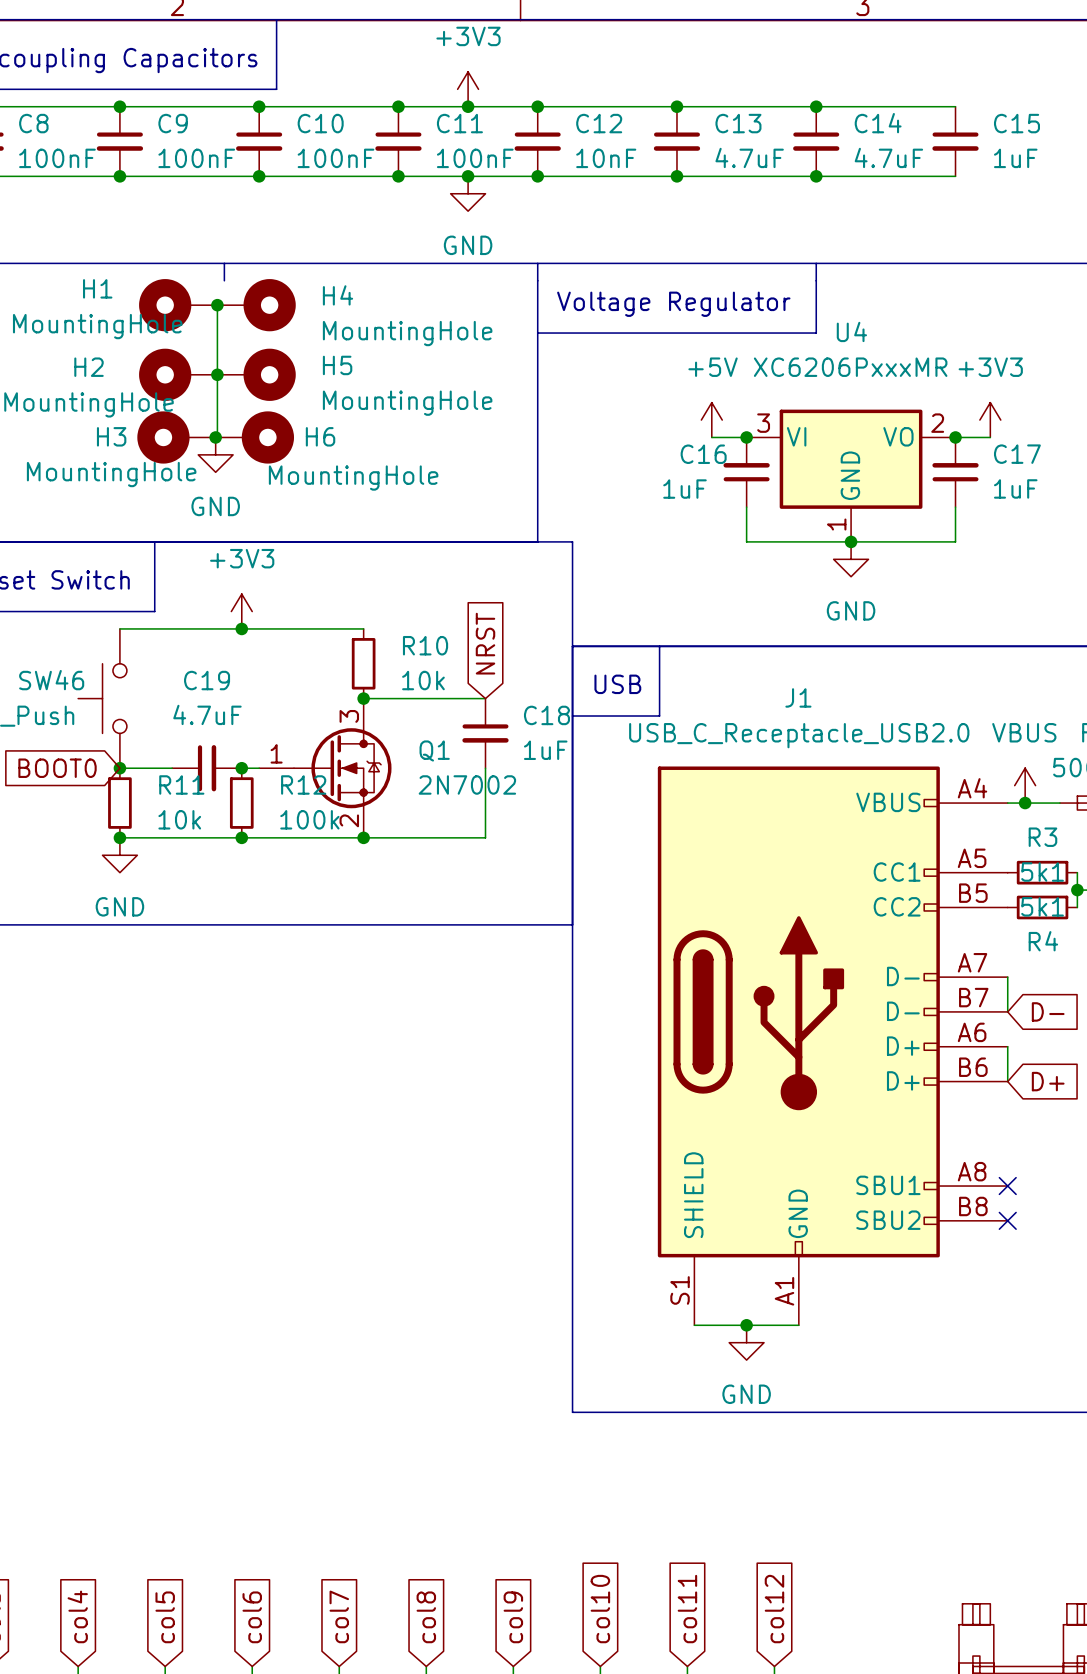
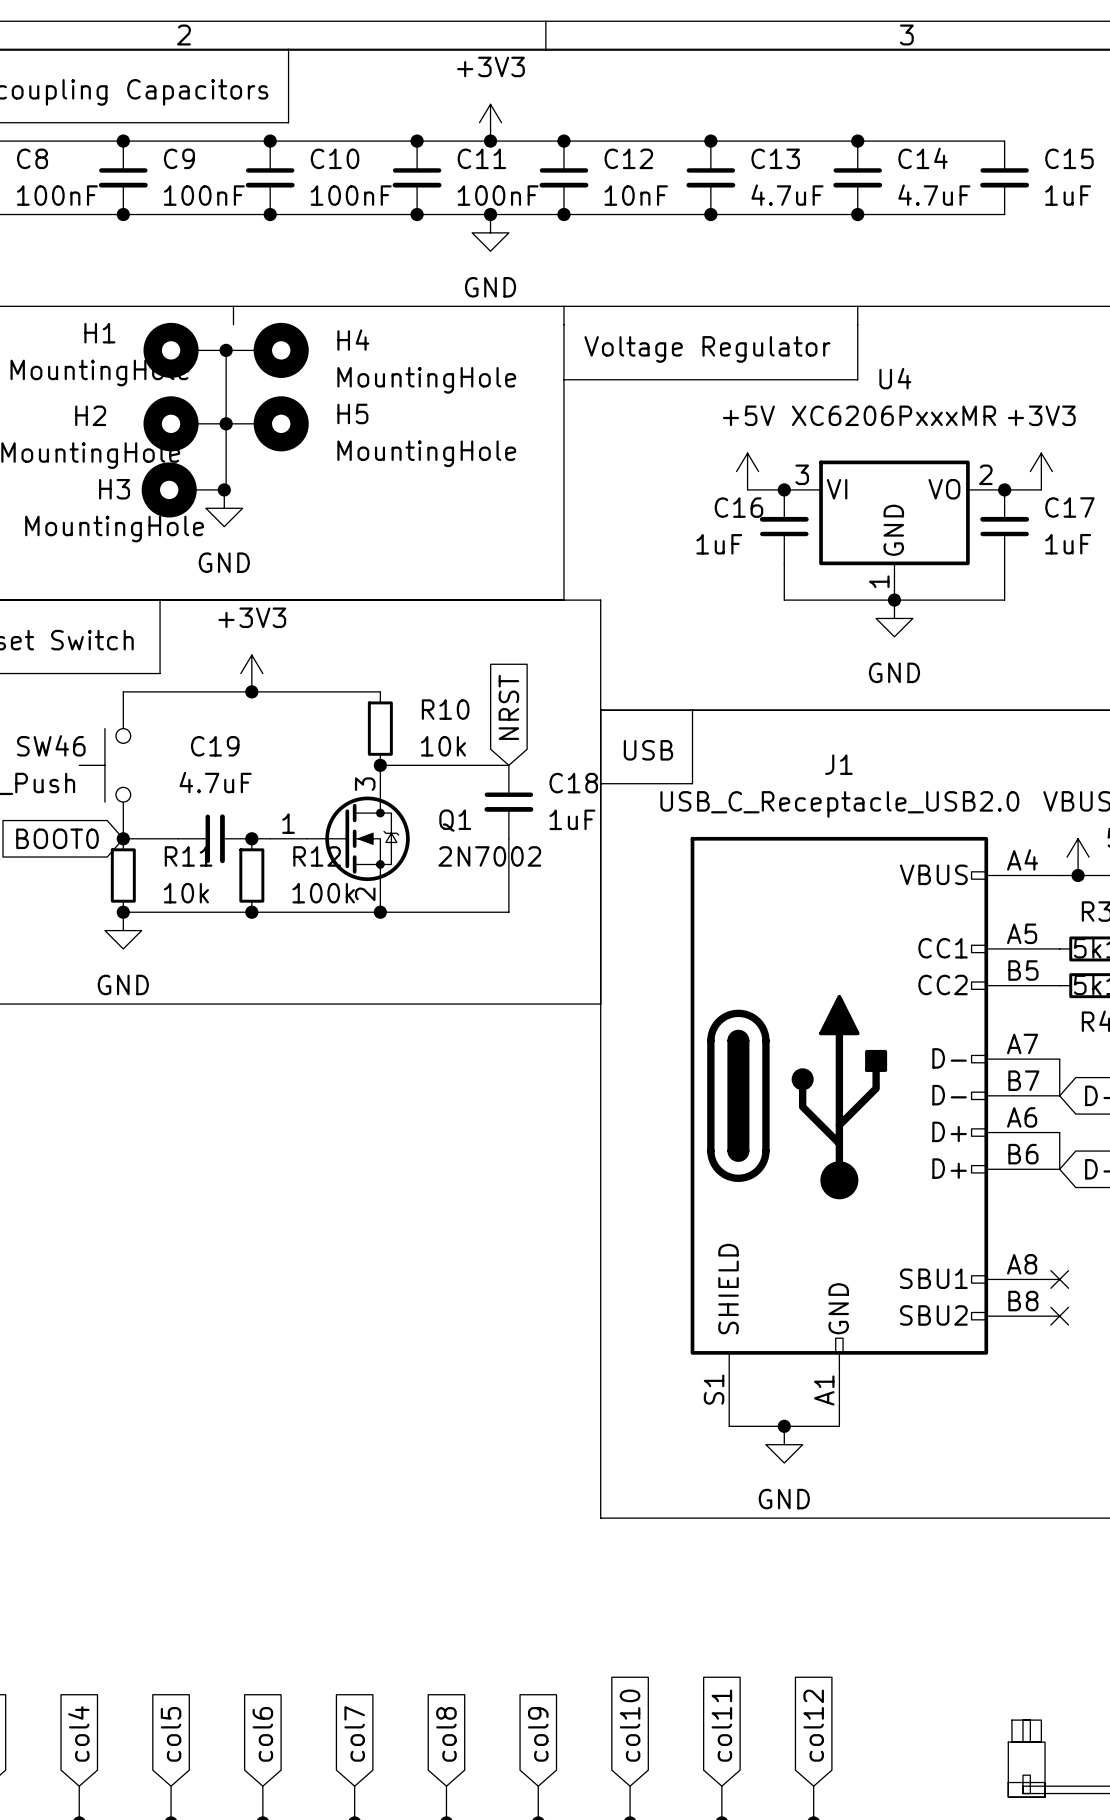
H6: MountingHole (254, 437) -> none

